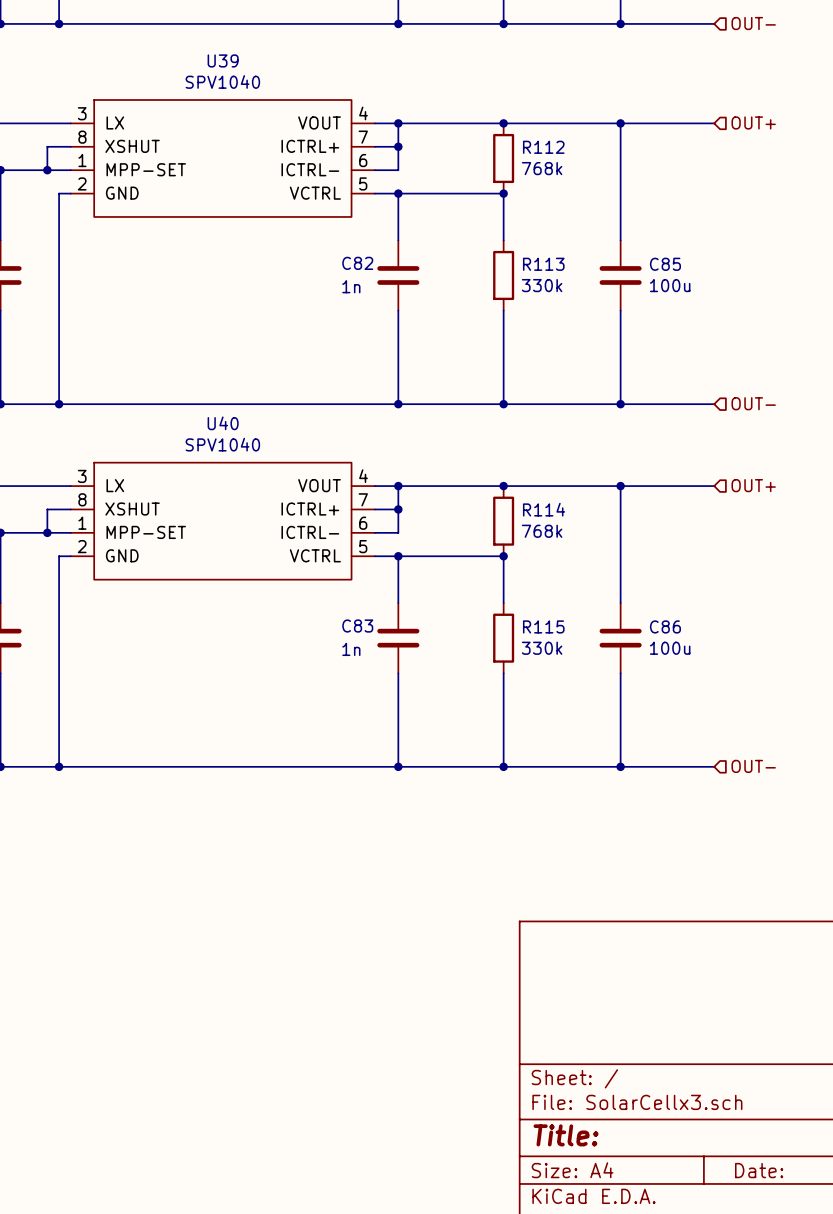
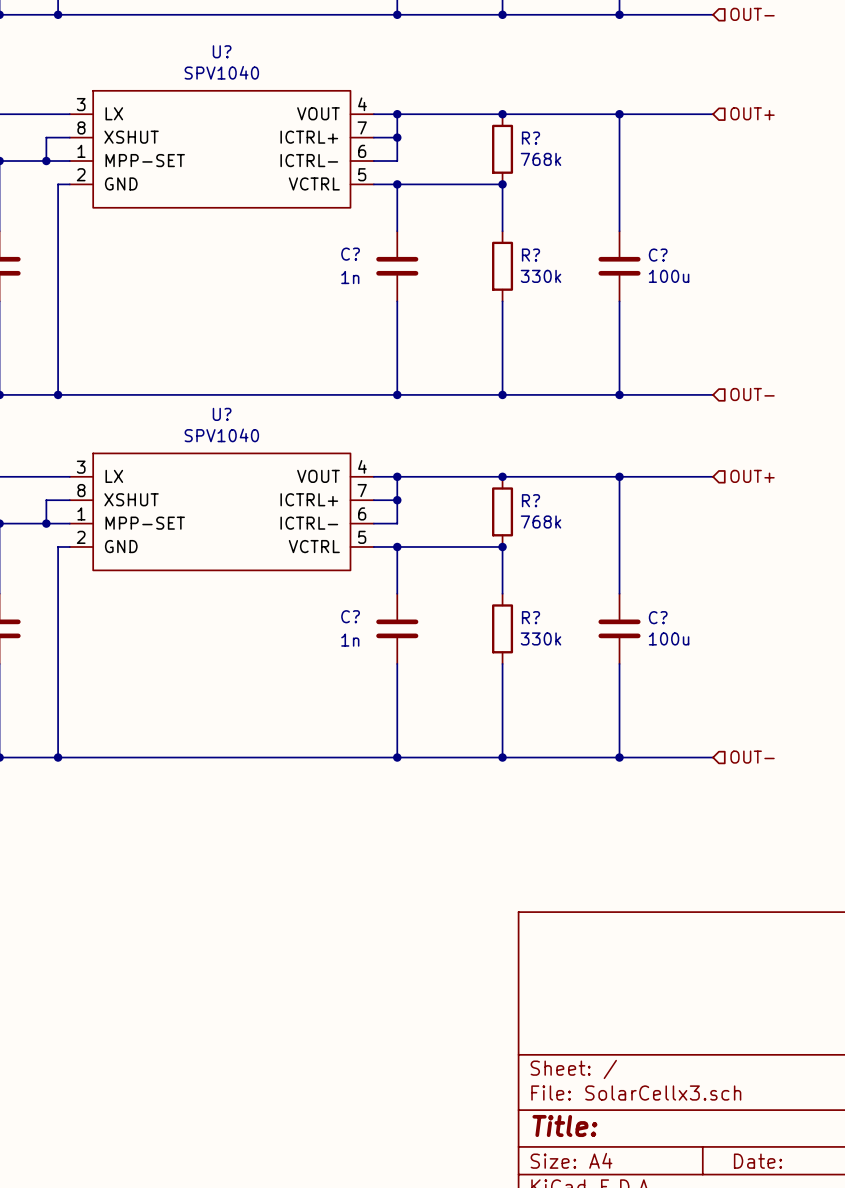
U39 name: U39 (223, 60) -> U? (222, 51)
R112 name: R112 (543, 147) -> R? (530, 138)
C82 name: C82 (357, 263) -> C? (350, 254)
R113 name: R113 (543, 264) -> R? (530, 255)
C85 name: C85 (665, 264) -> C? (658, 255)
U40 name: U40 (223, 423) -> U? (222, 414)
R114 name: R114 (544, 509) -> R? (530, 500)
C83 name: C83 (357, 626) -> C? (350, 616)
R115 name: R115 (543, 626) -> R? (530, 617)
C86 name: C86 (665, 626) -> C? (658, 617)

